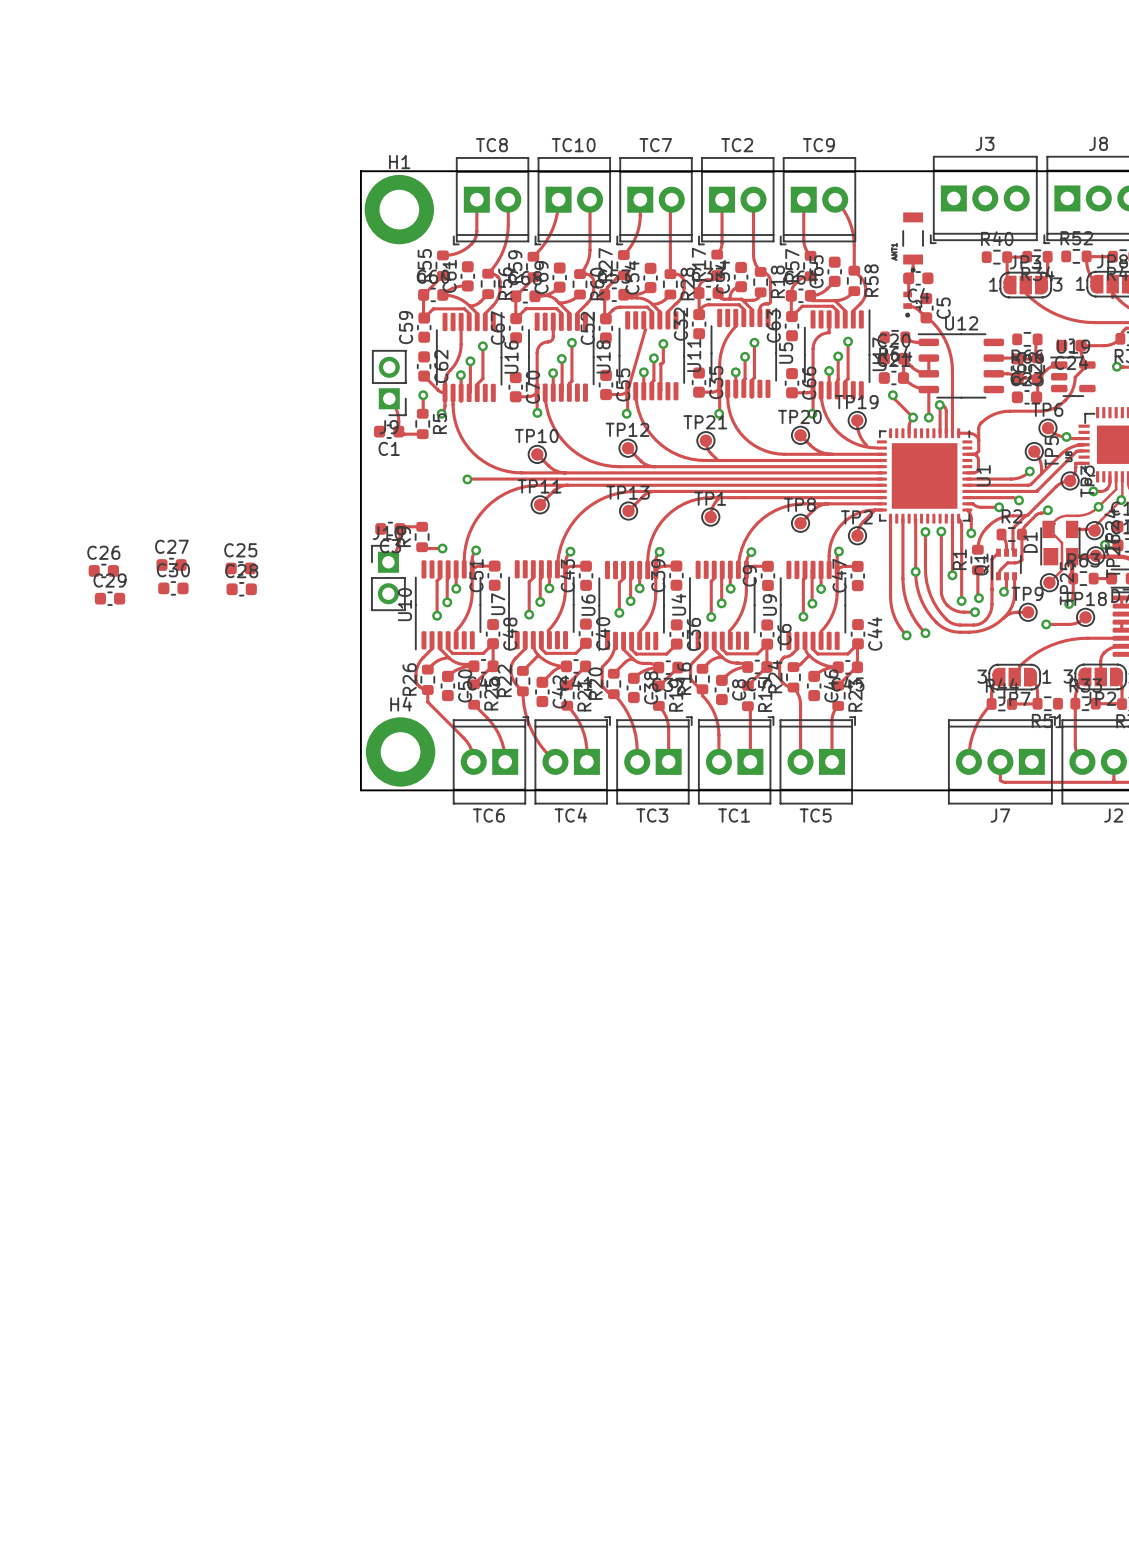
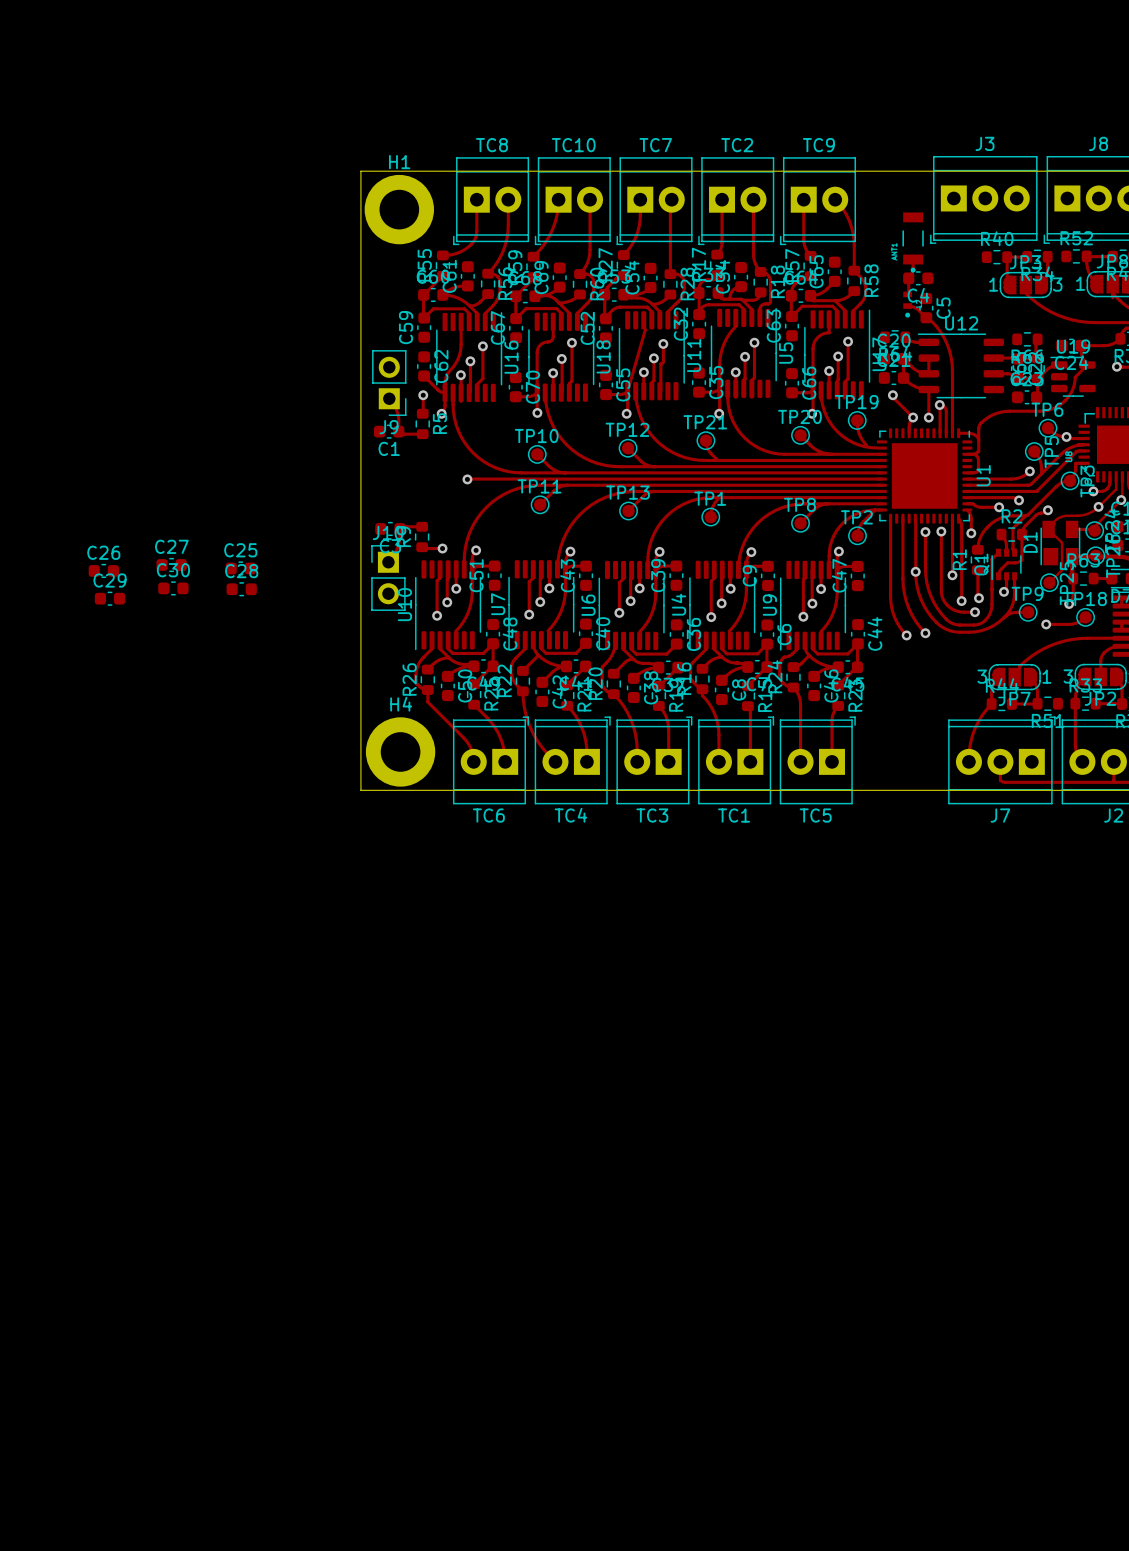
via: (1104, 544) -> none

